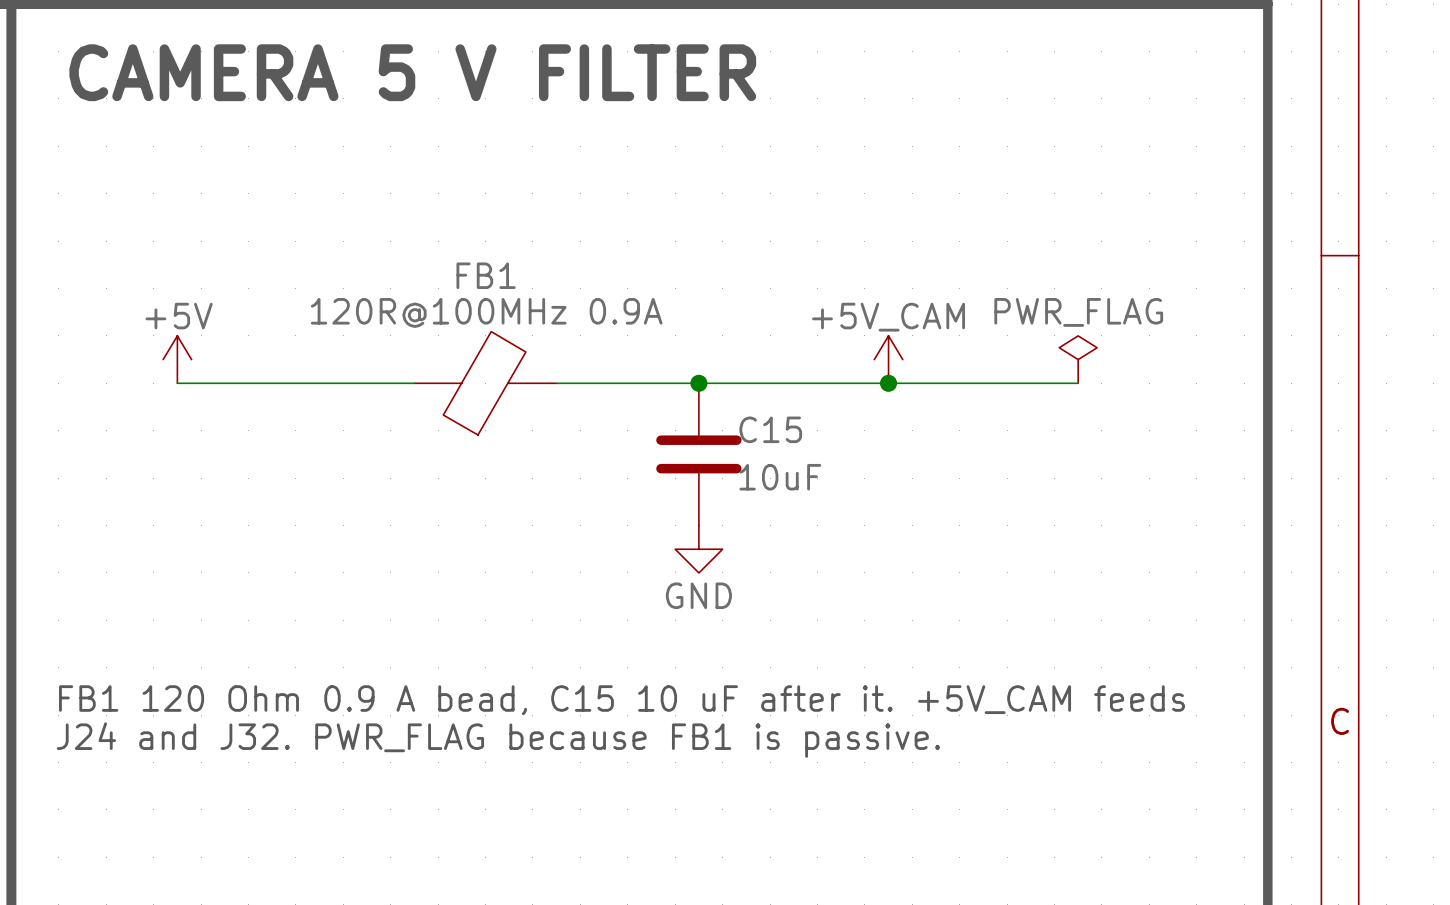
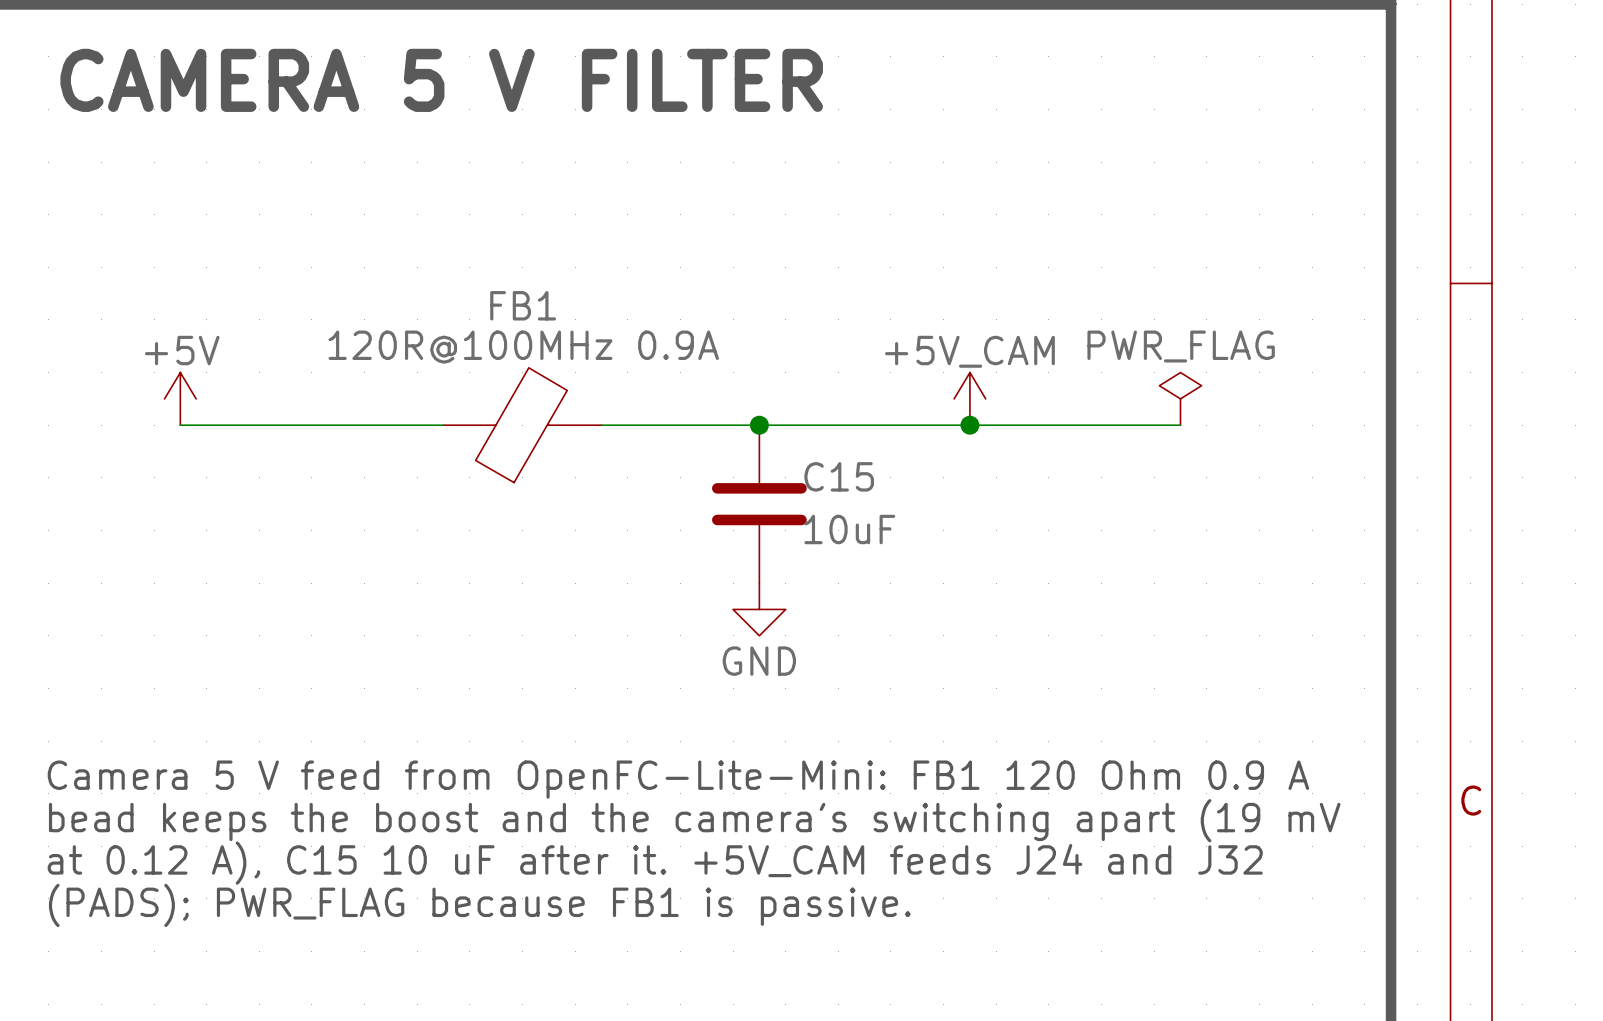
text: FB1 120 Ohm 0.9 A bead, C15 10 uF after it. +5V_CAM feeds (622, 700) -> Camera 5 V feed from OpenFC-Lite-Mini: FB1 120 Ohm 0.9 A (678, 779)
text: J24 and J32. PWR_FLAG because FB1 is passive. (498, 740) -> bead keeps the boost and the camera's switching apart (19 mV (694, 820)
text: none -> at 0.12 A), C15 10 uF after it. +5V_CAM feeds J24 and J32 (655, 863)
text: none -> (PADS); PWR_FLAG because FB1 is passive. (479, 905)

